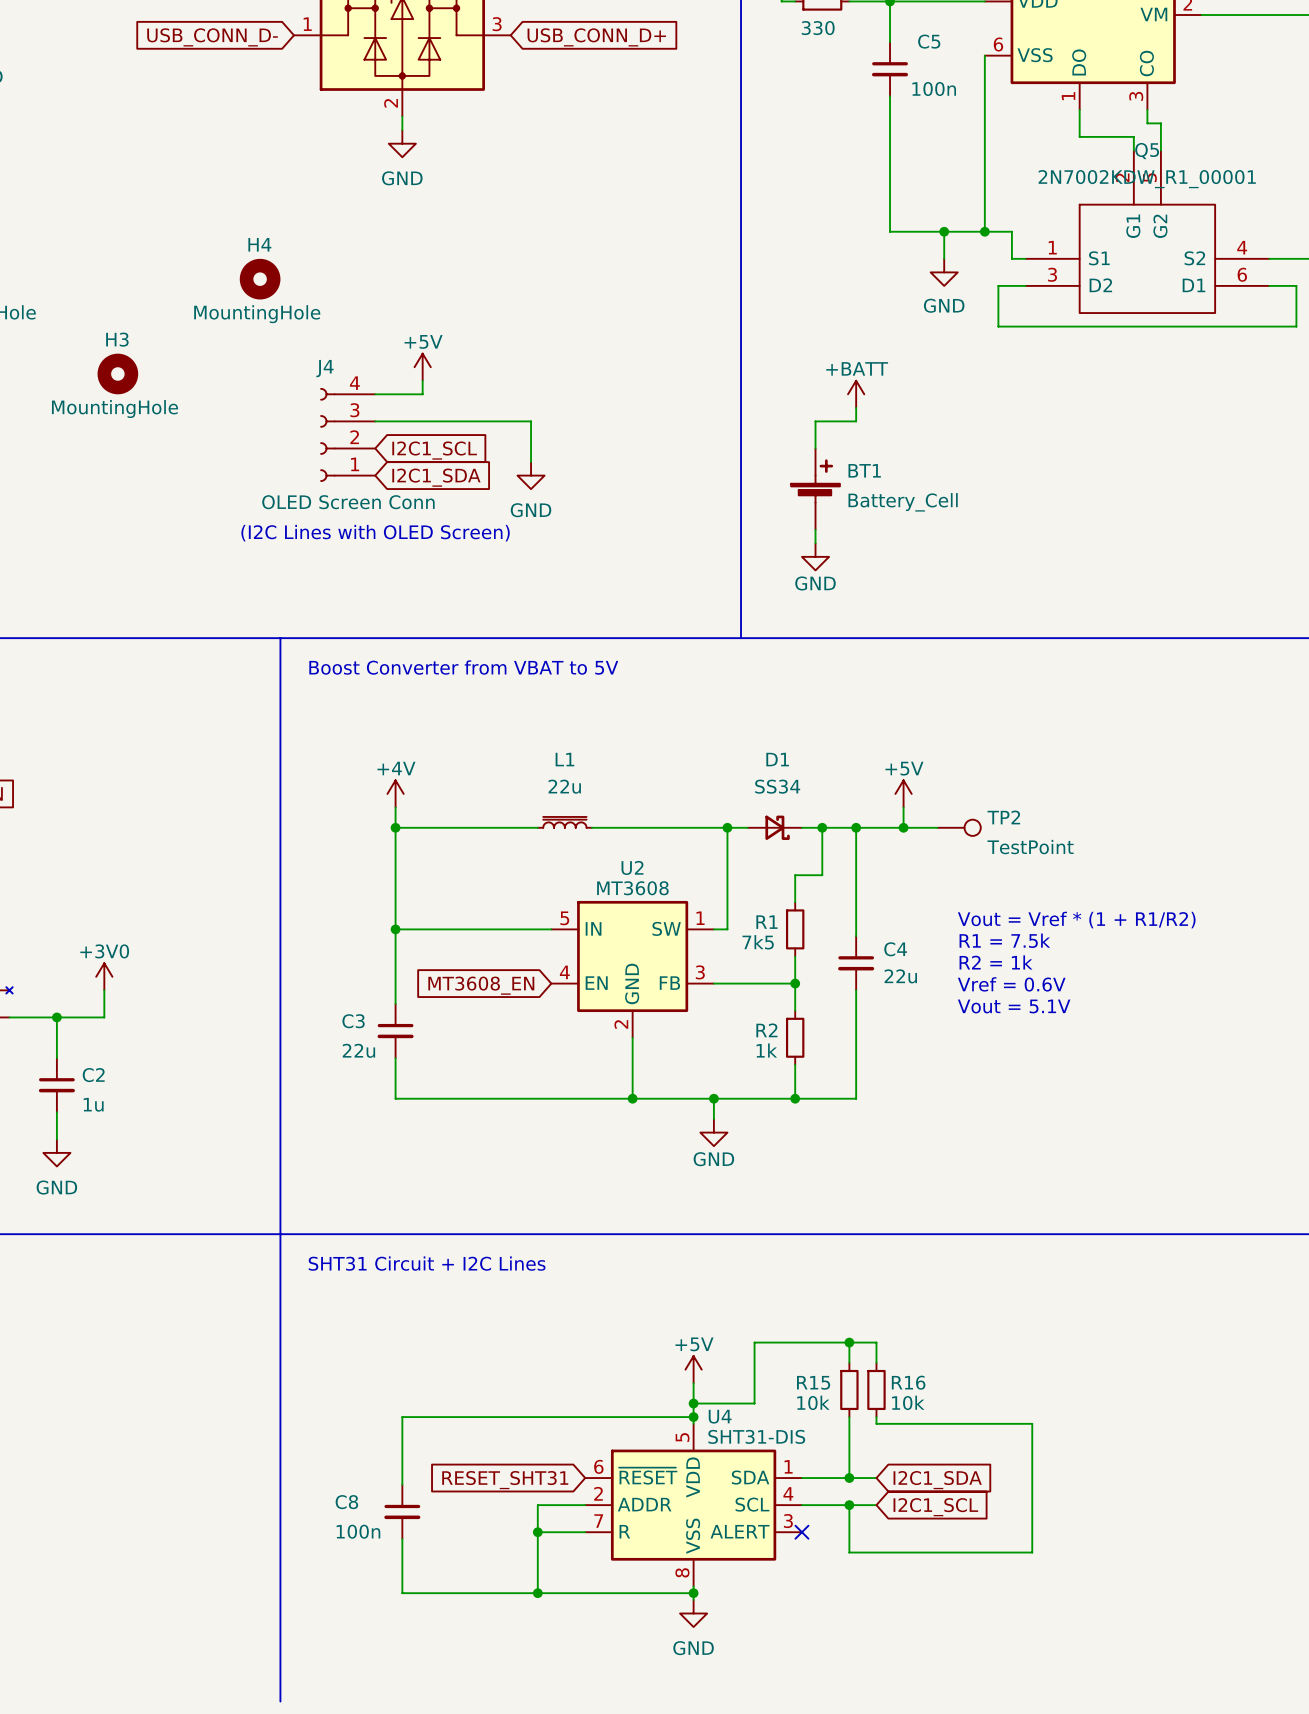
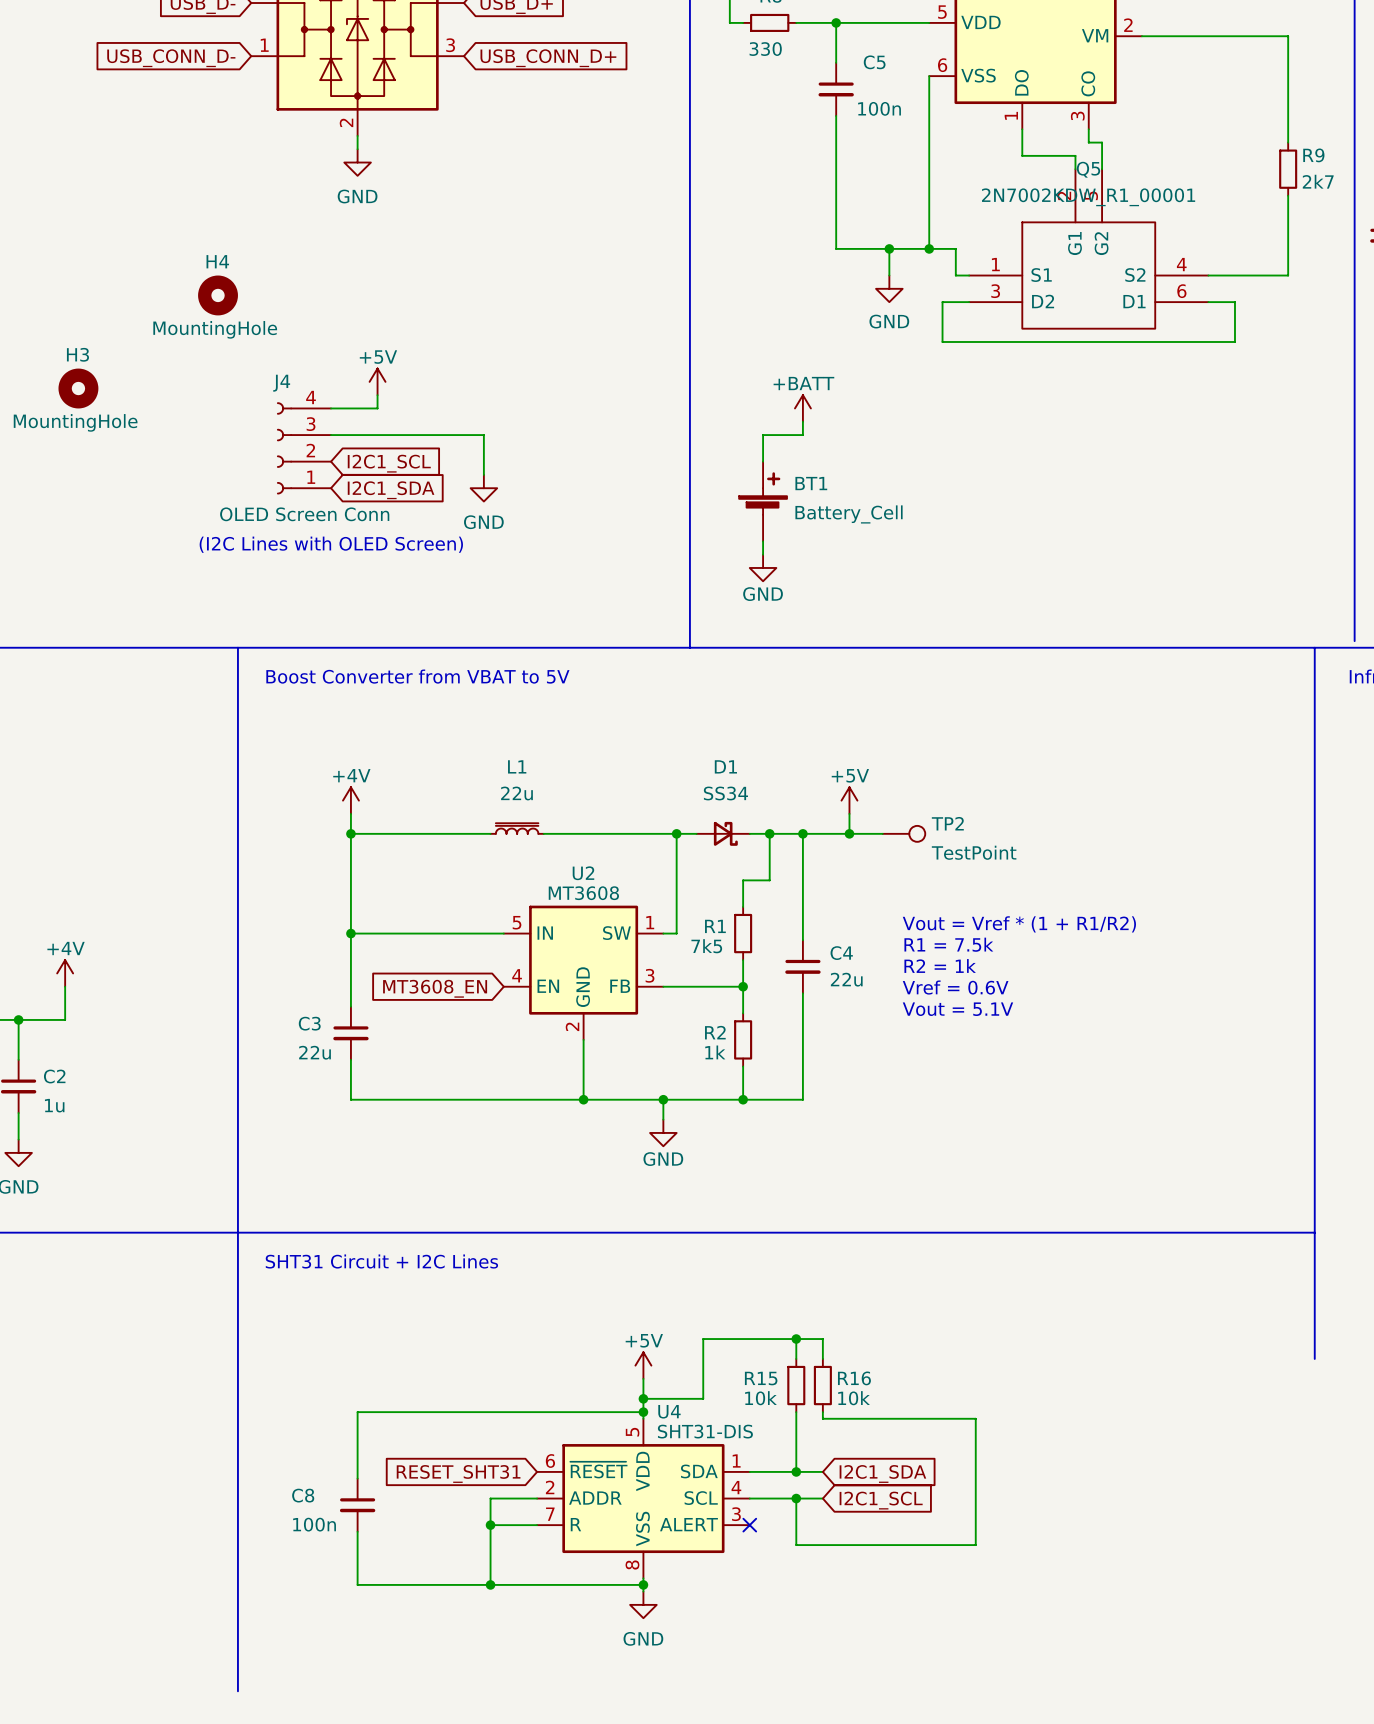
power symbol: +3V0 (104, 976) -> +4V (65, 973)

